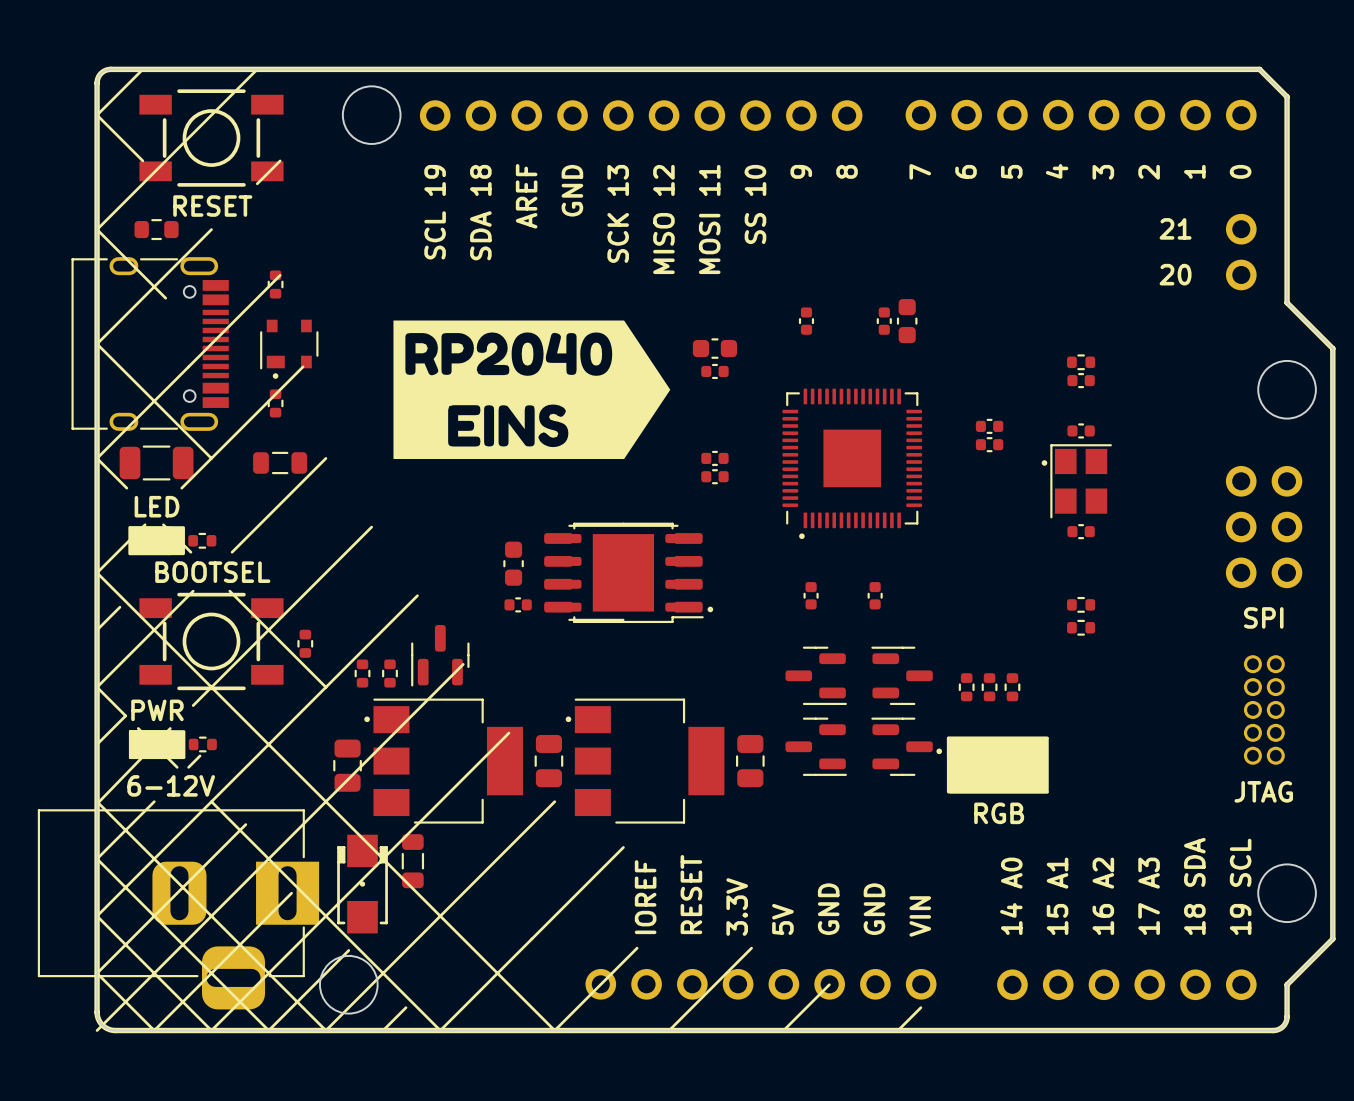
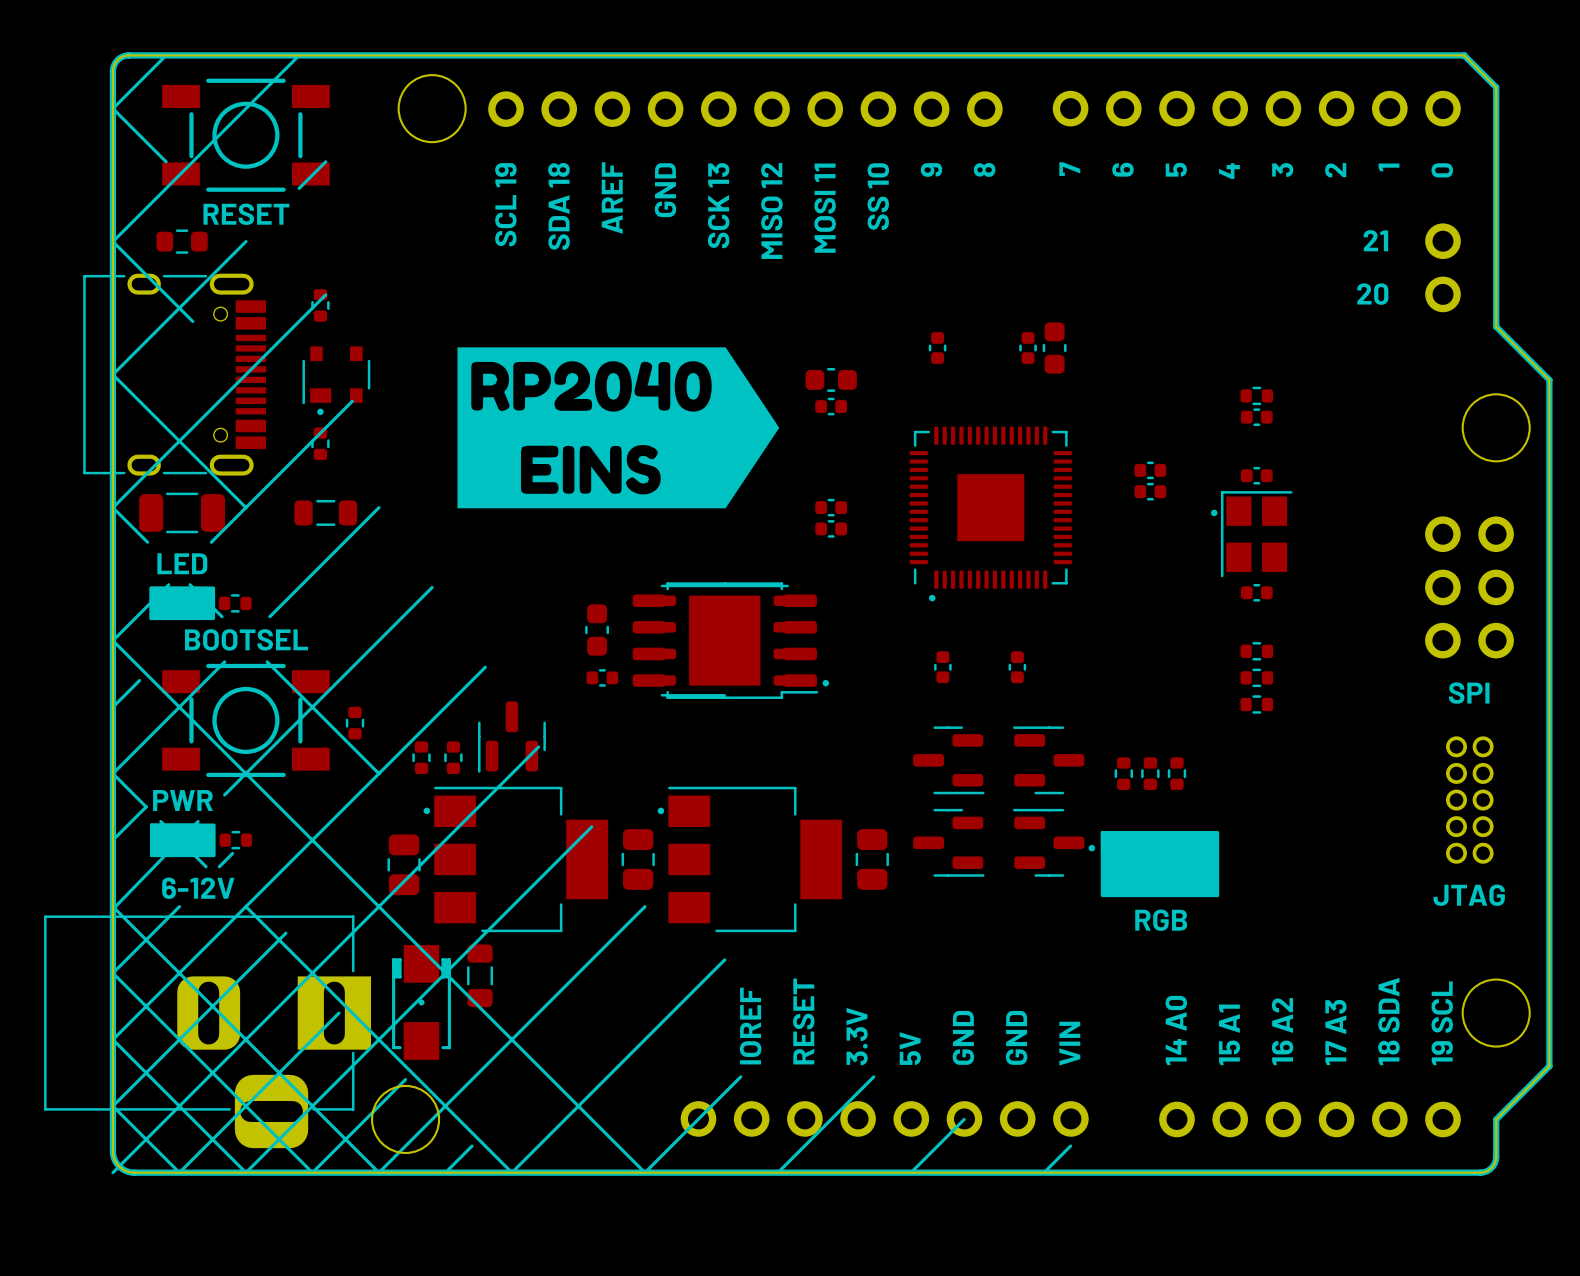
part: none -> (1256, 651)

